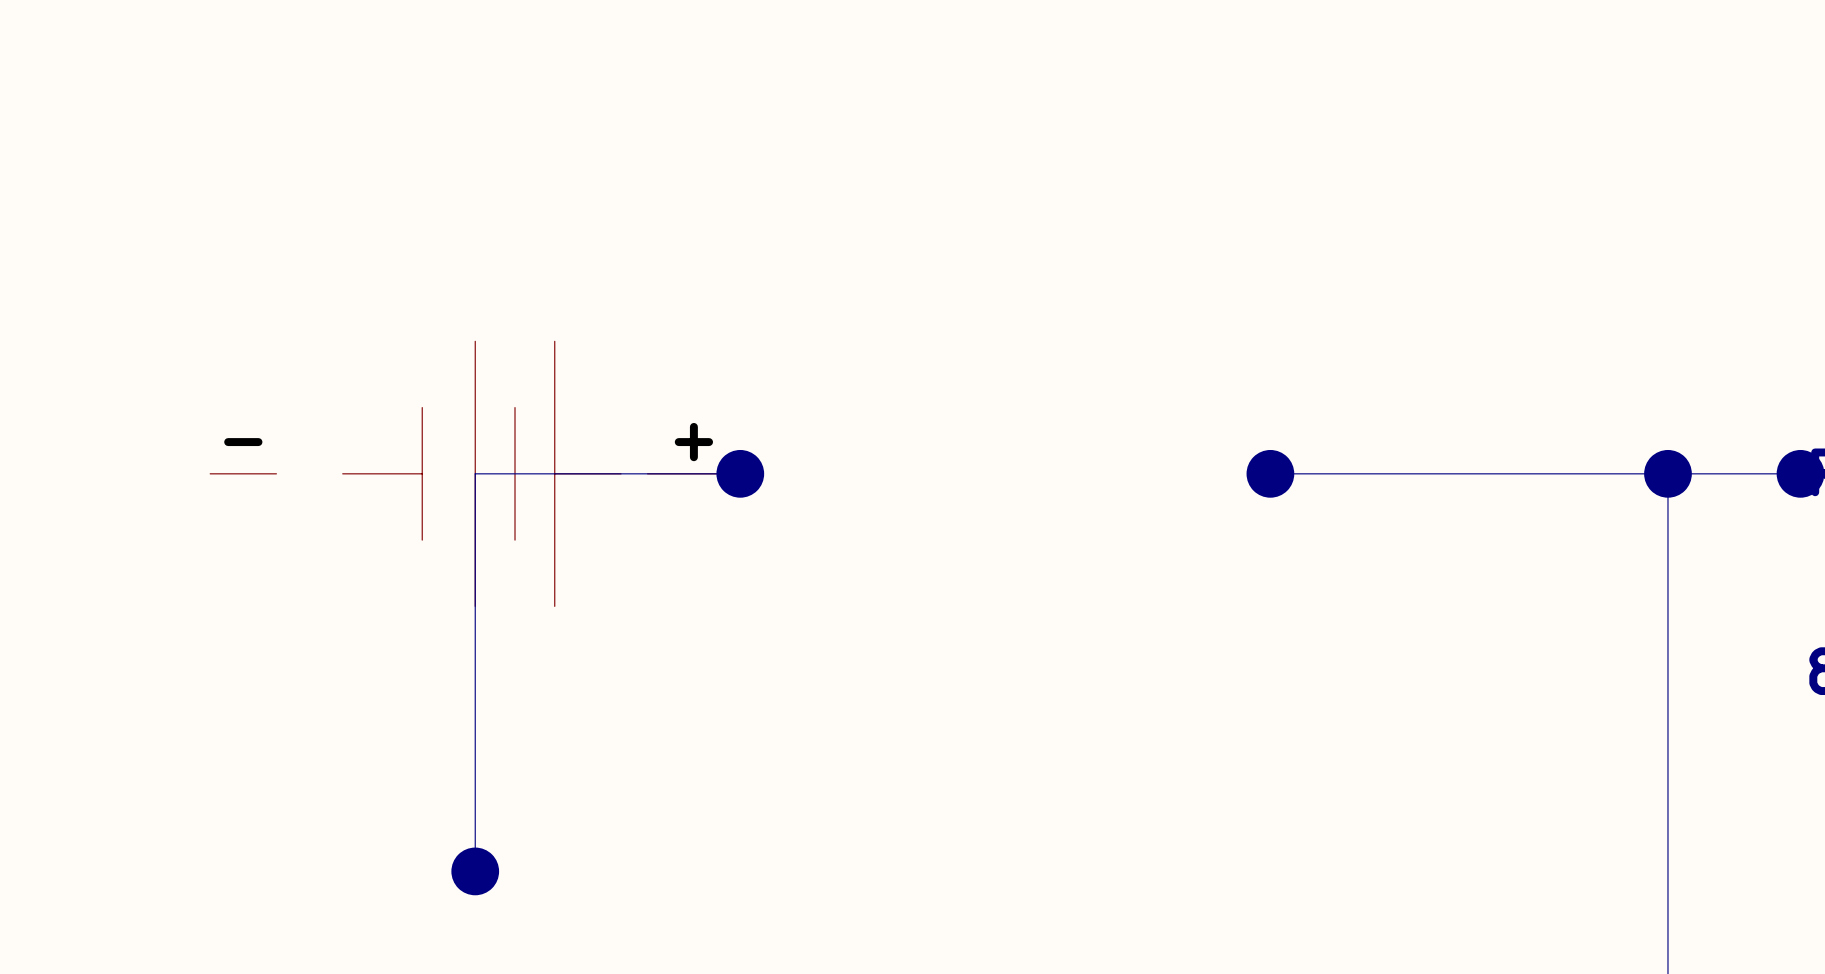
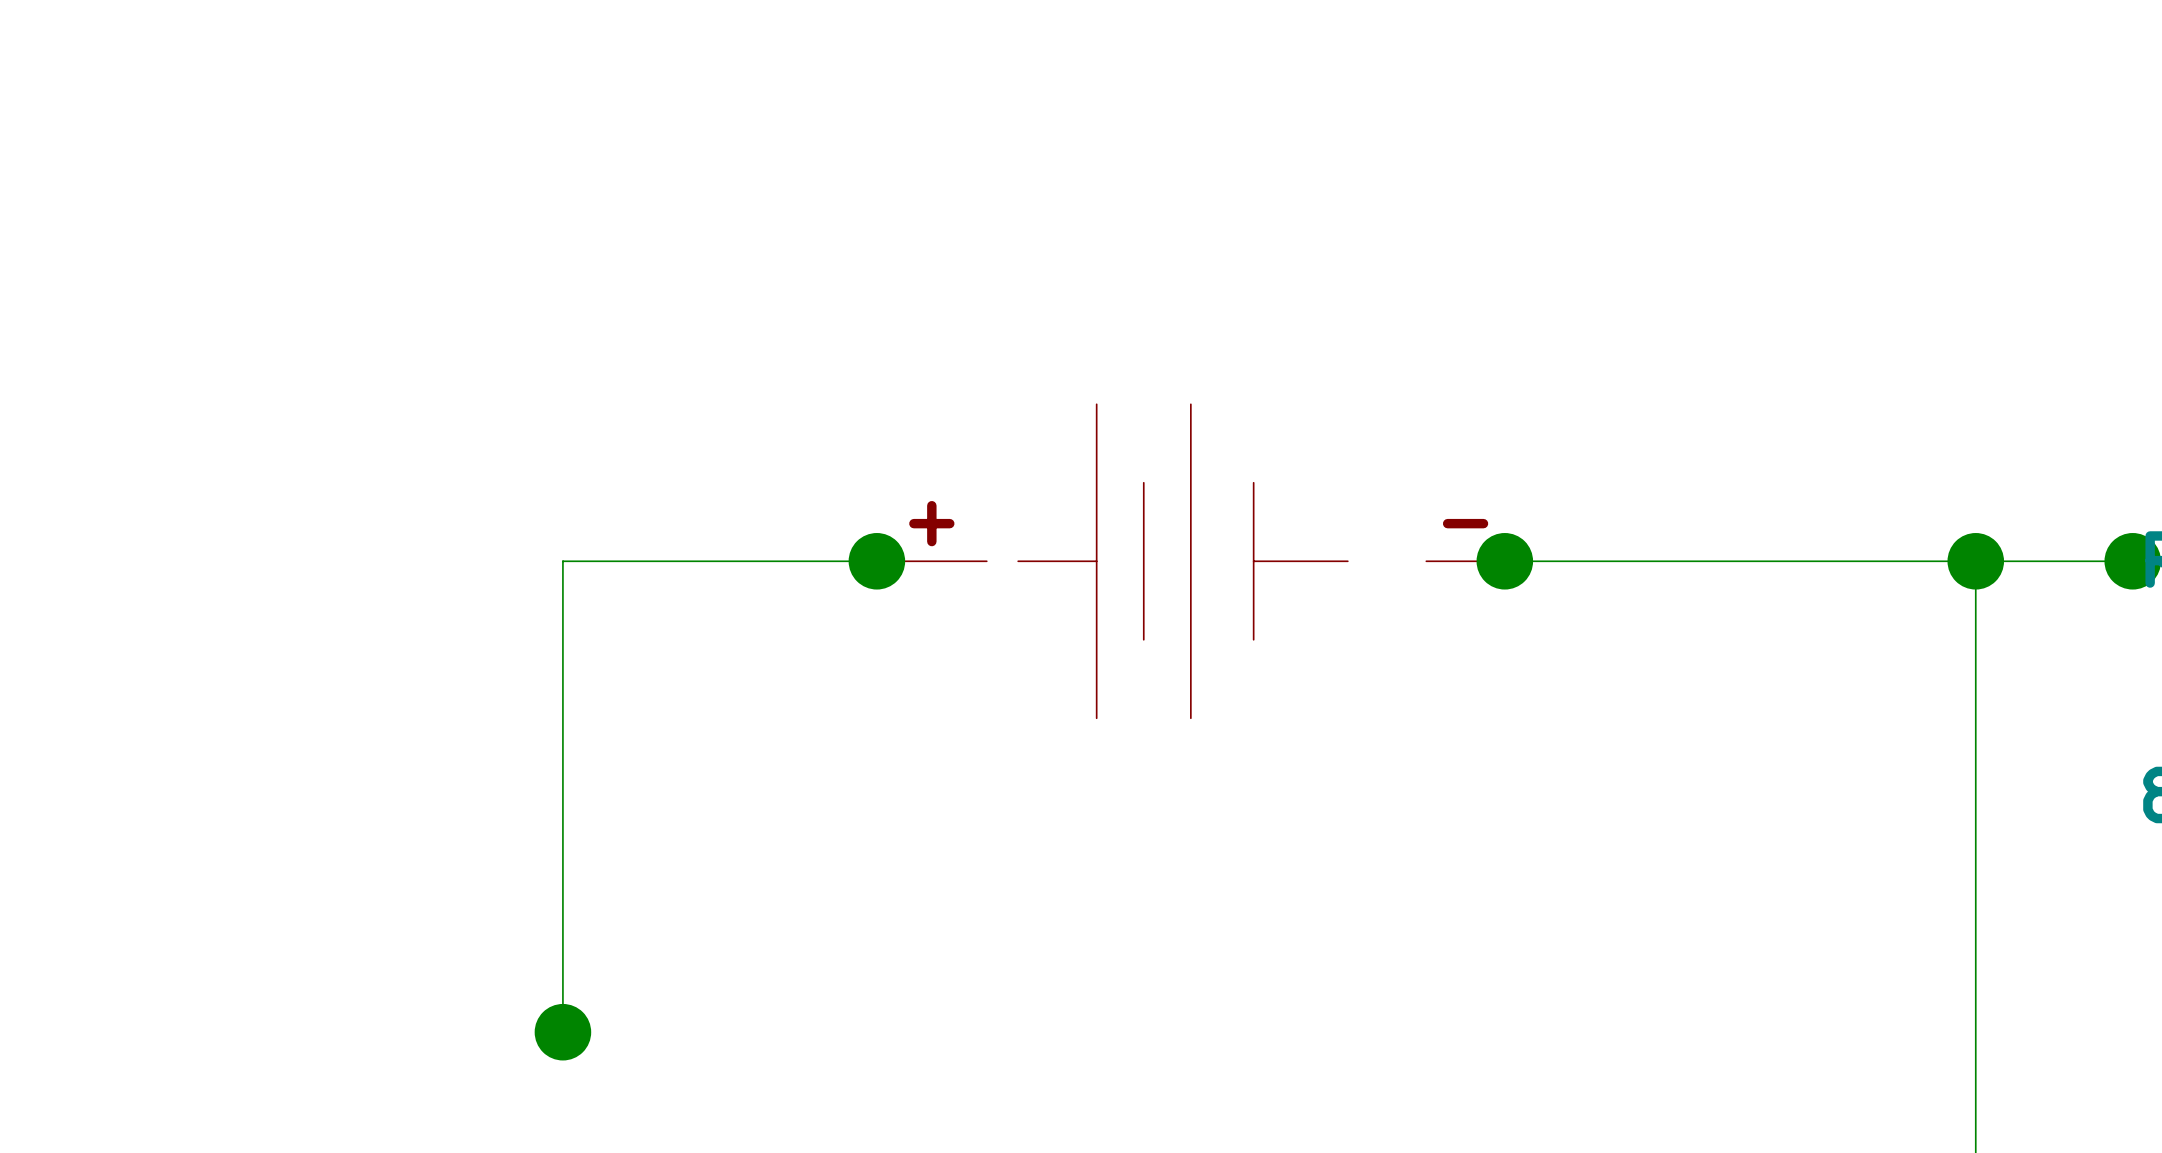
part position: (475, 473) -> (1190, 561)
part rotation: 0° (481, 473) -> 180° (1183, 561)

